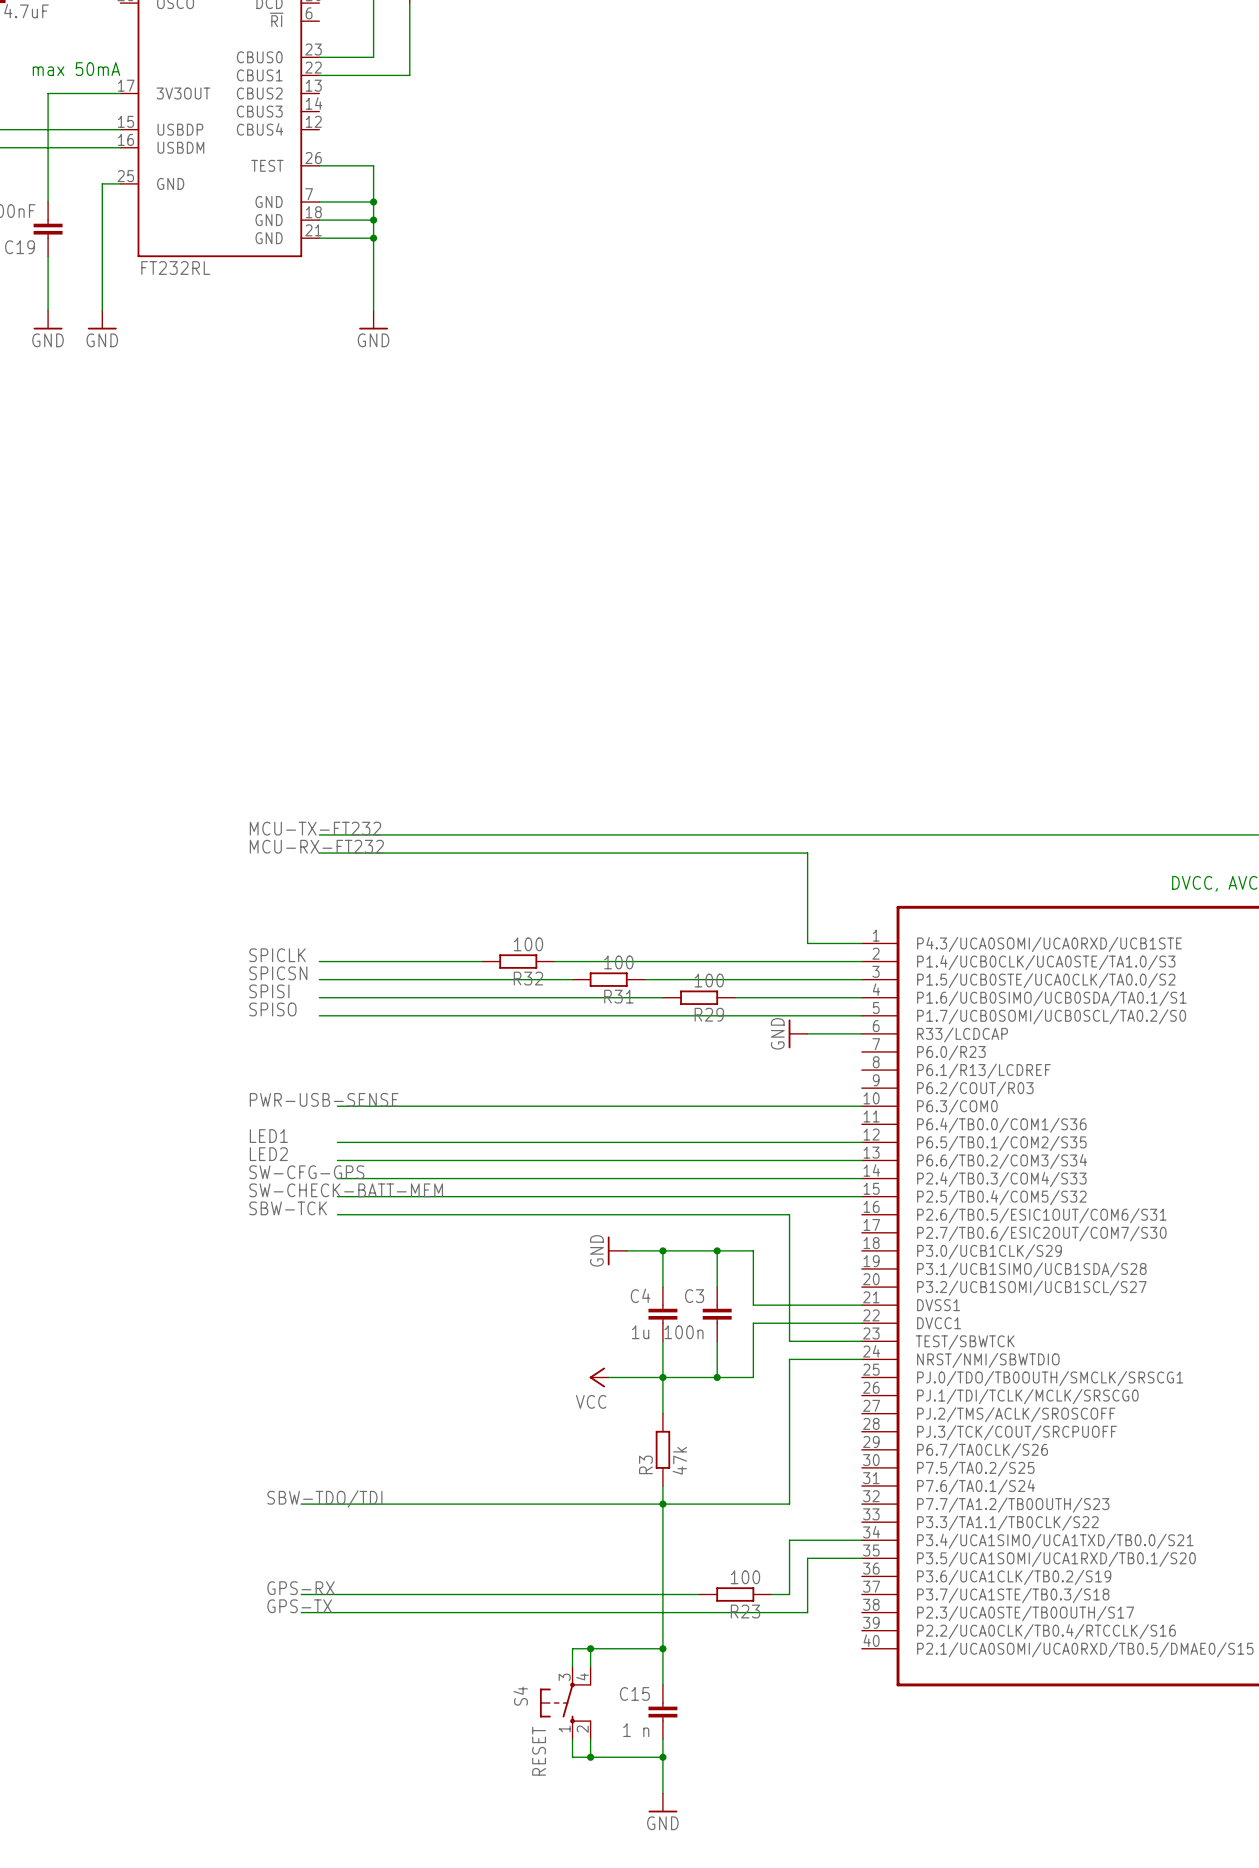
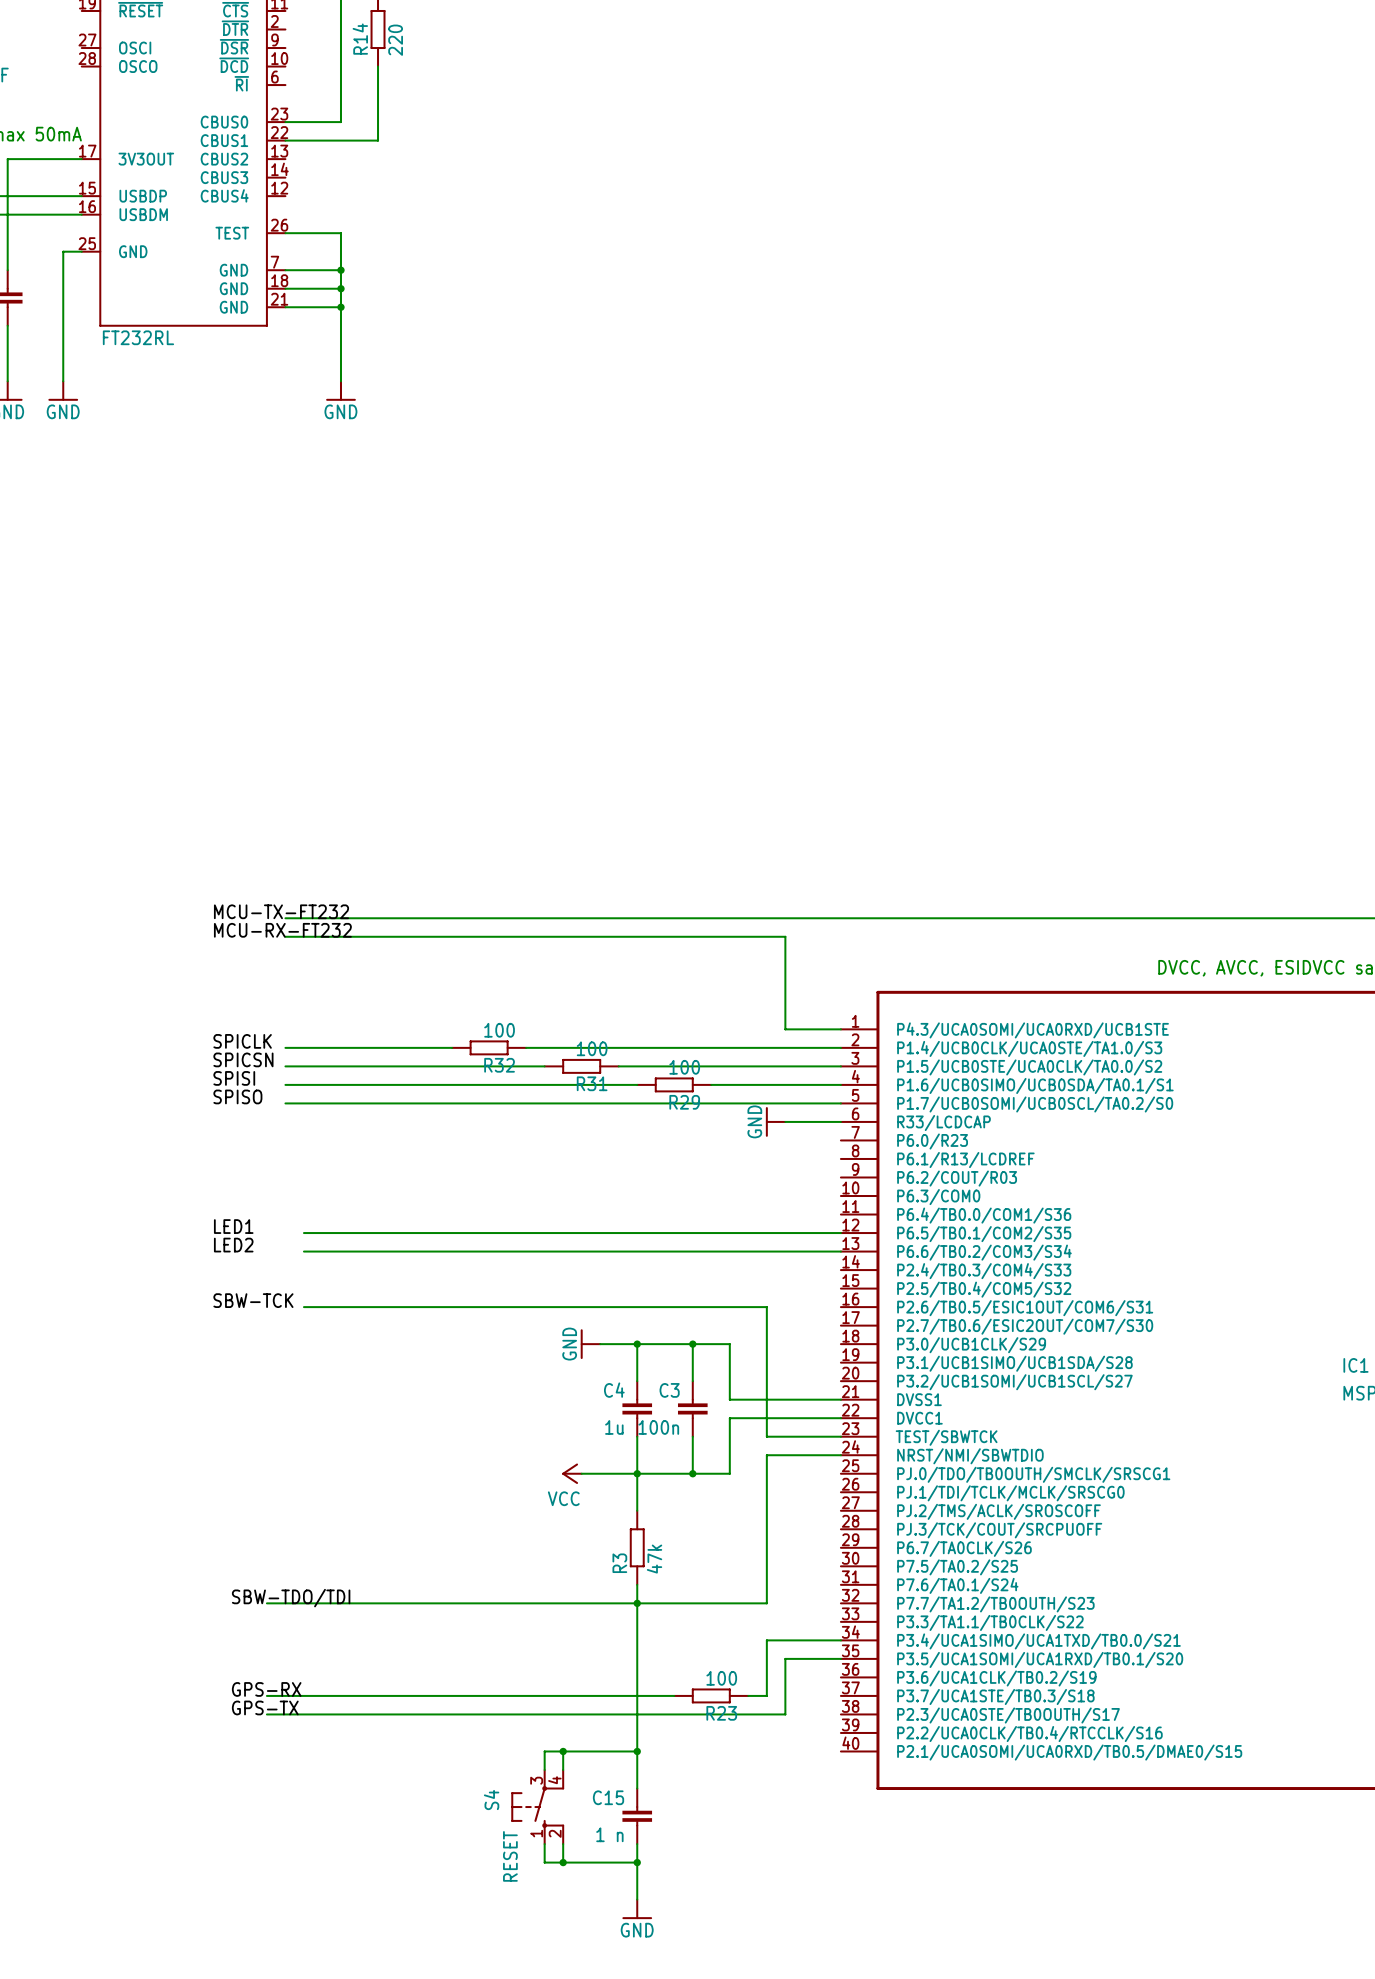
label: PWR-USB-SENSE (324, 1099) -> none
wire: (337, 1106) (861, 1106) -> none
label: SW-CFG-GPS (306, 1172) -> none
wire: (337, 1178) (861, 1178) -> none
label: SW-CHECK-BATT-MEM (346, 1190) -> none
wire: (337, 1196) (861, 1196) -> none

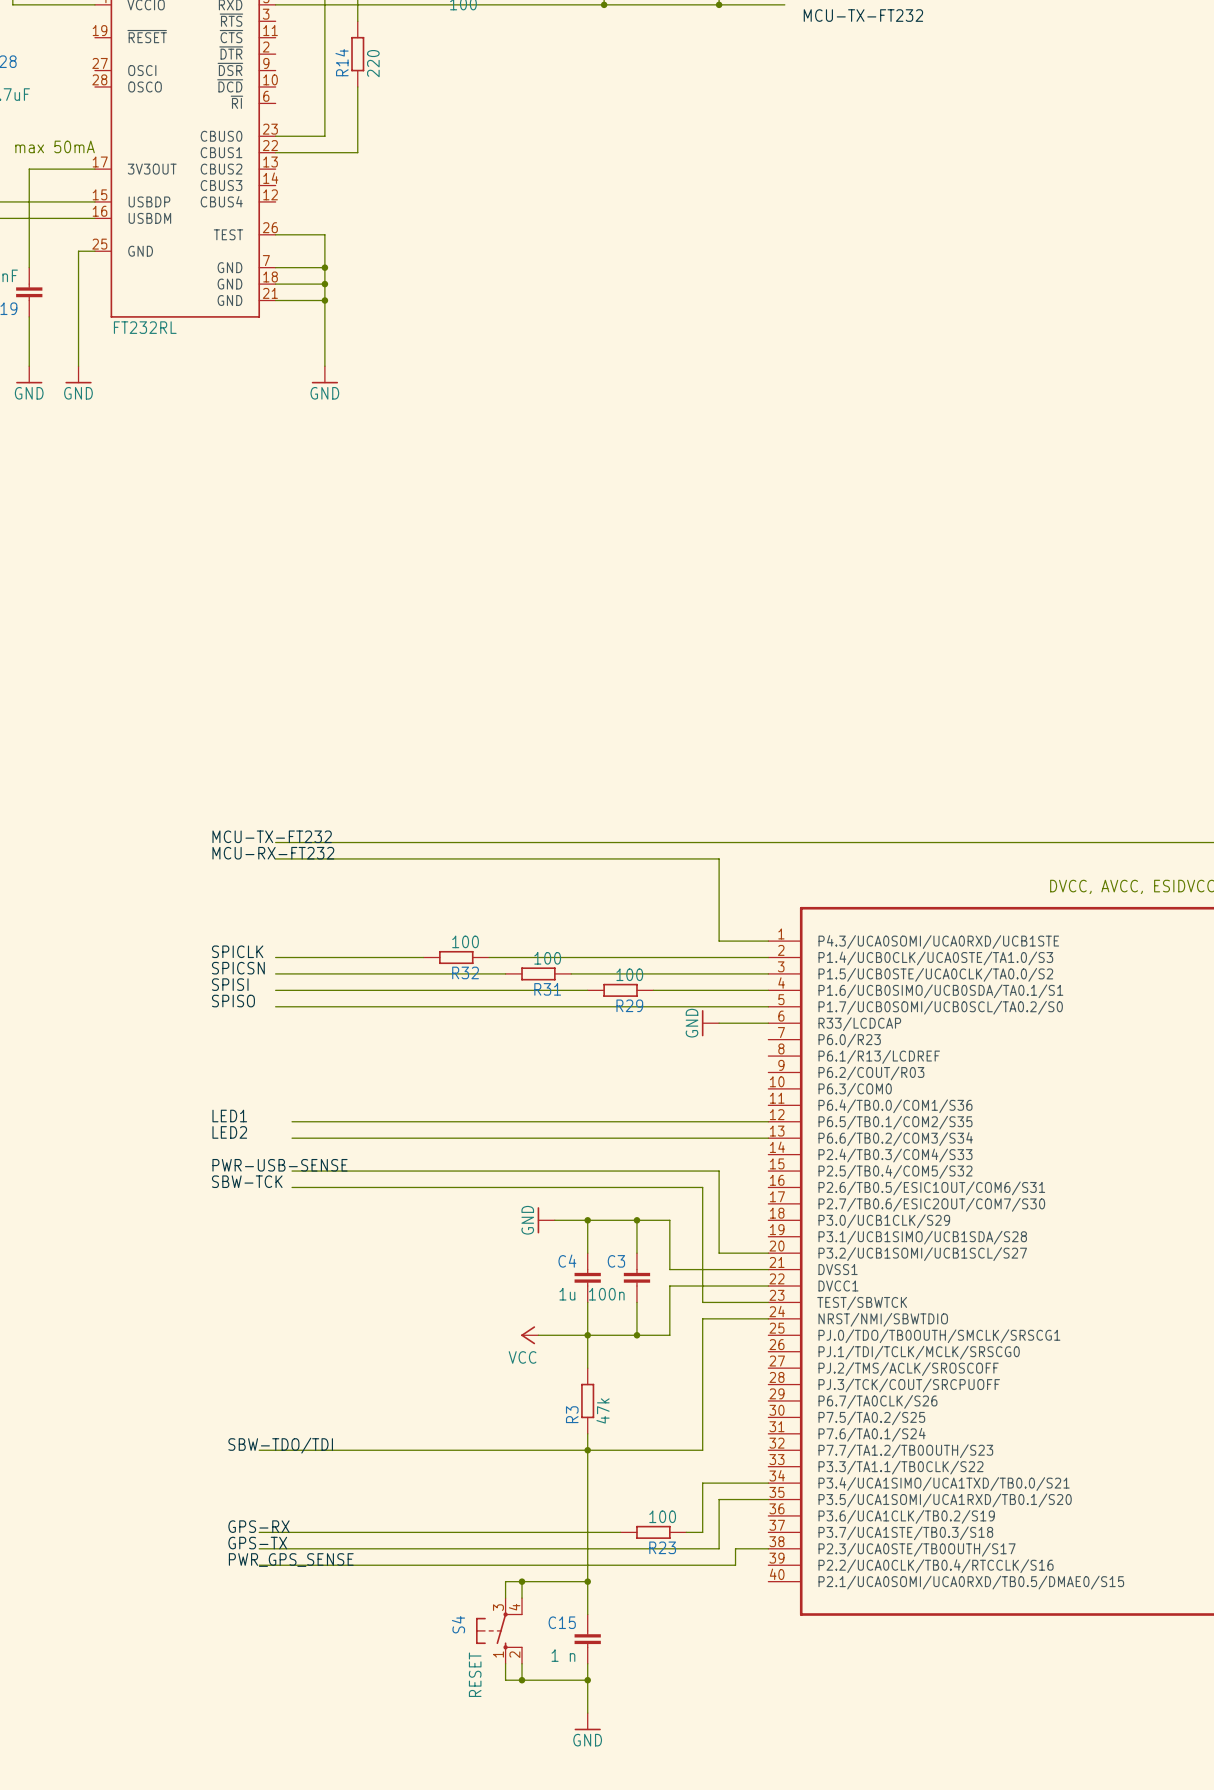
label: none -> PWR-USB-SENSE (280, 1165)
wire: none -> (292, 1171) (719, 1171) (719, 1253) (768, 1253)
wire: none -> (768, 1548) (735, 1548) (735, 1565) (259, 1565)
label: none -> PWR_GPS_SENSE (291, 1560)

